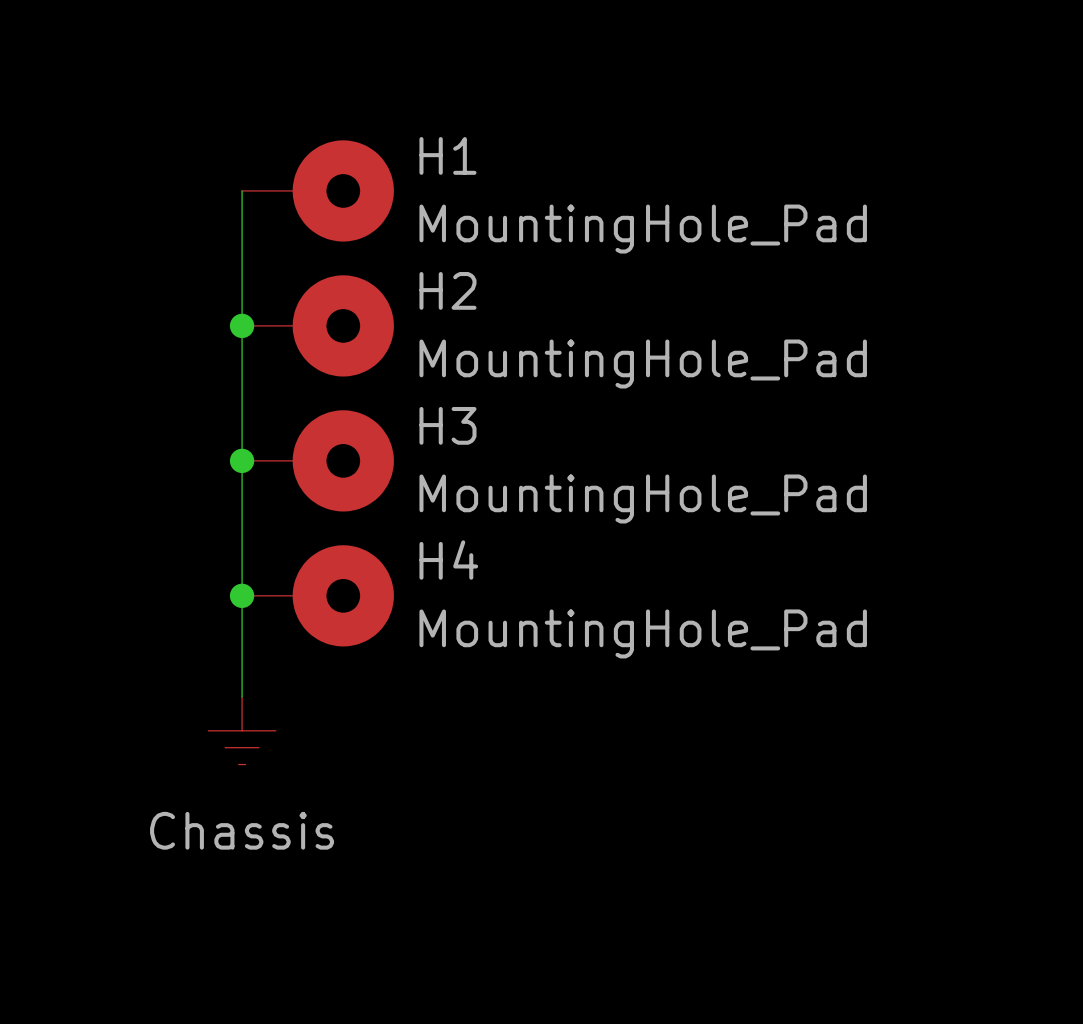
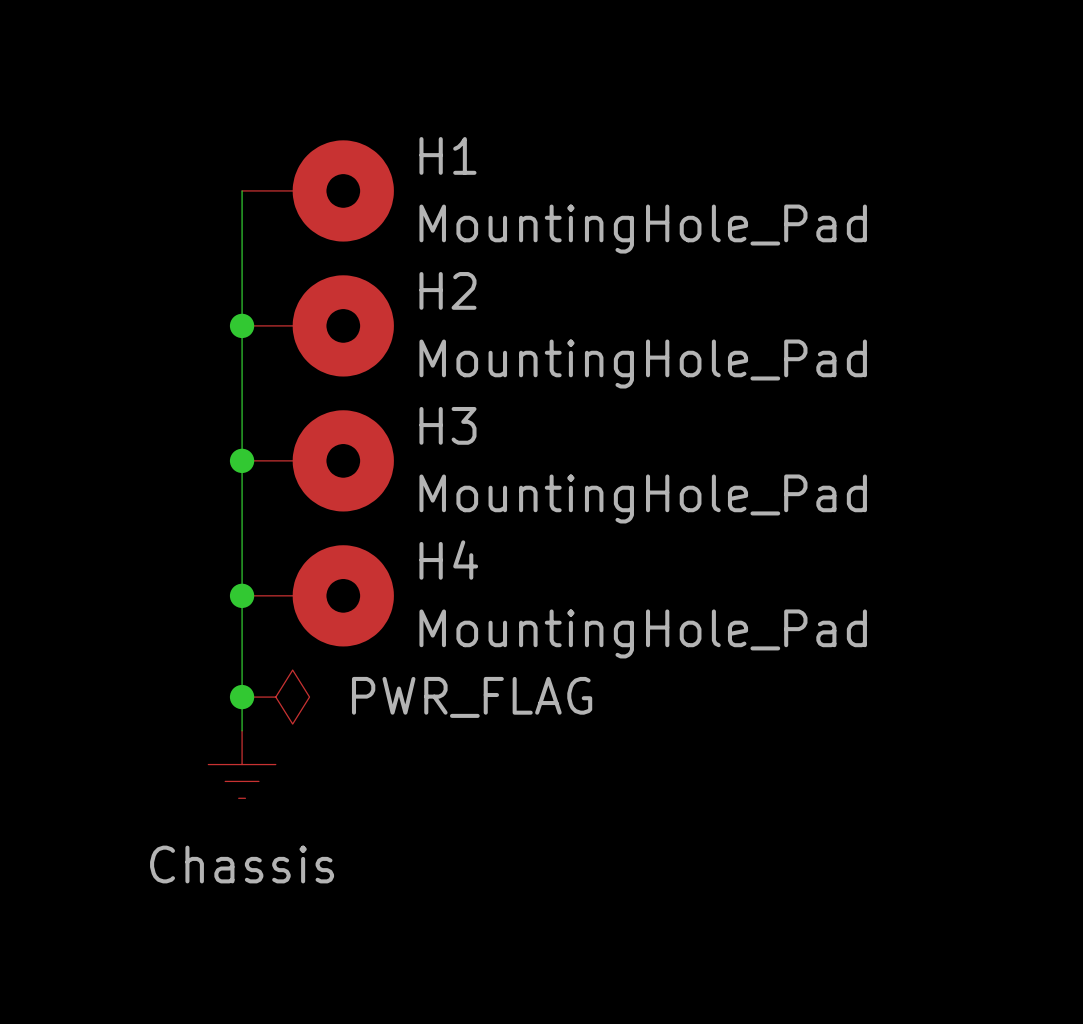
junction: none -> (242, 697)
power symbol: none -> PWR_FLAG (275, 697)
power symbol position: Chassis (242, 730) -> Chassis (242, 764)

